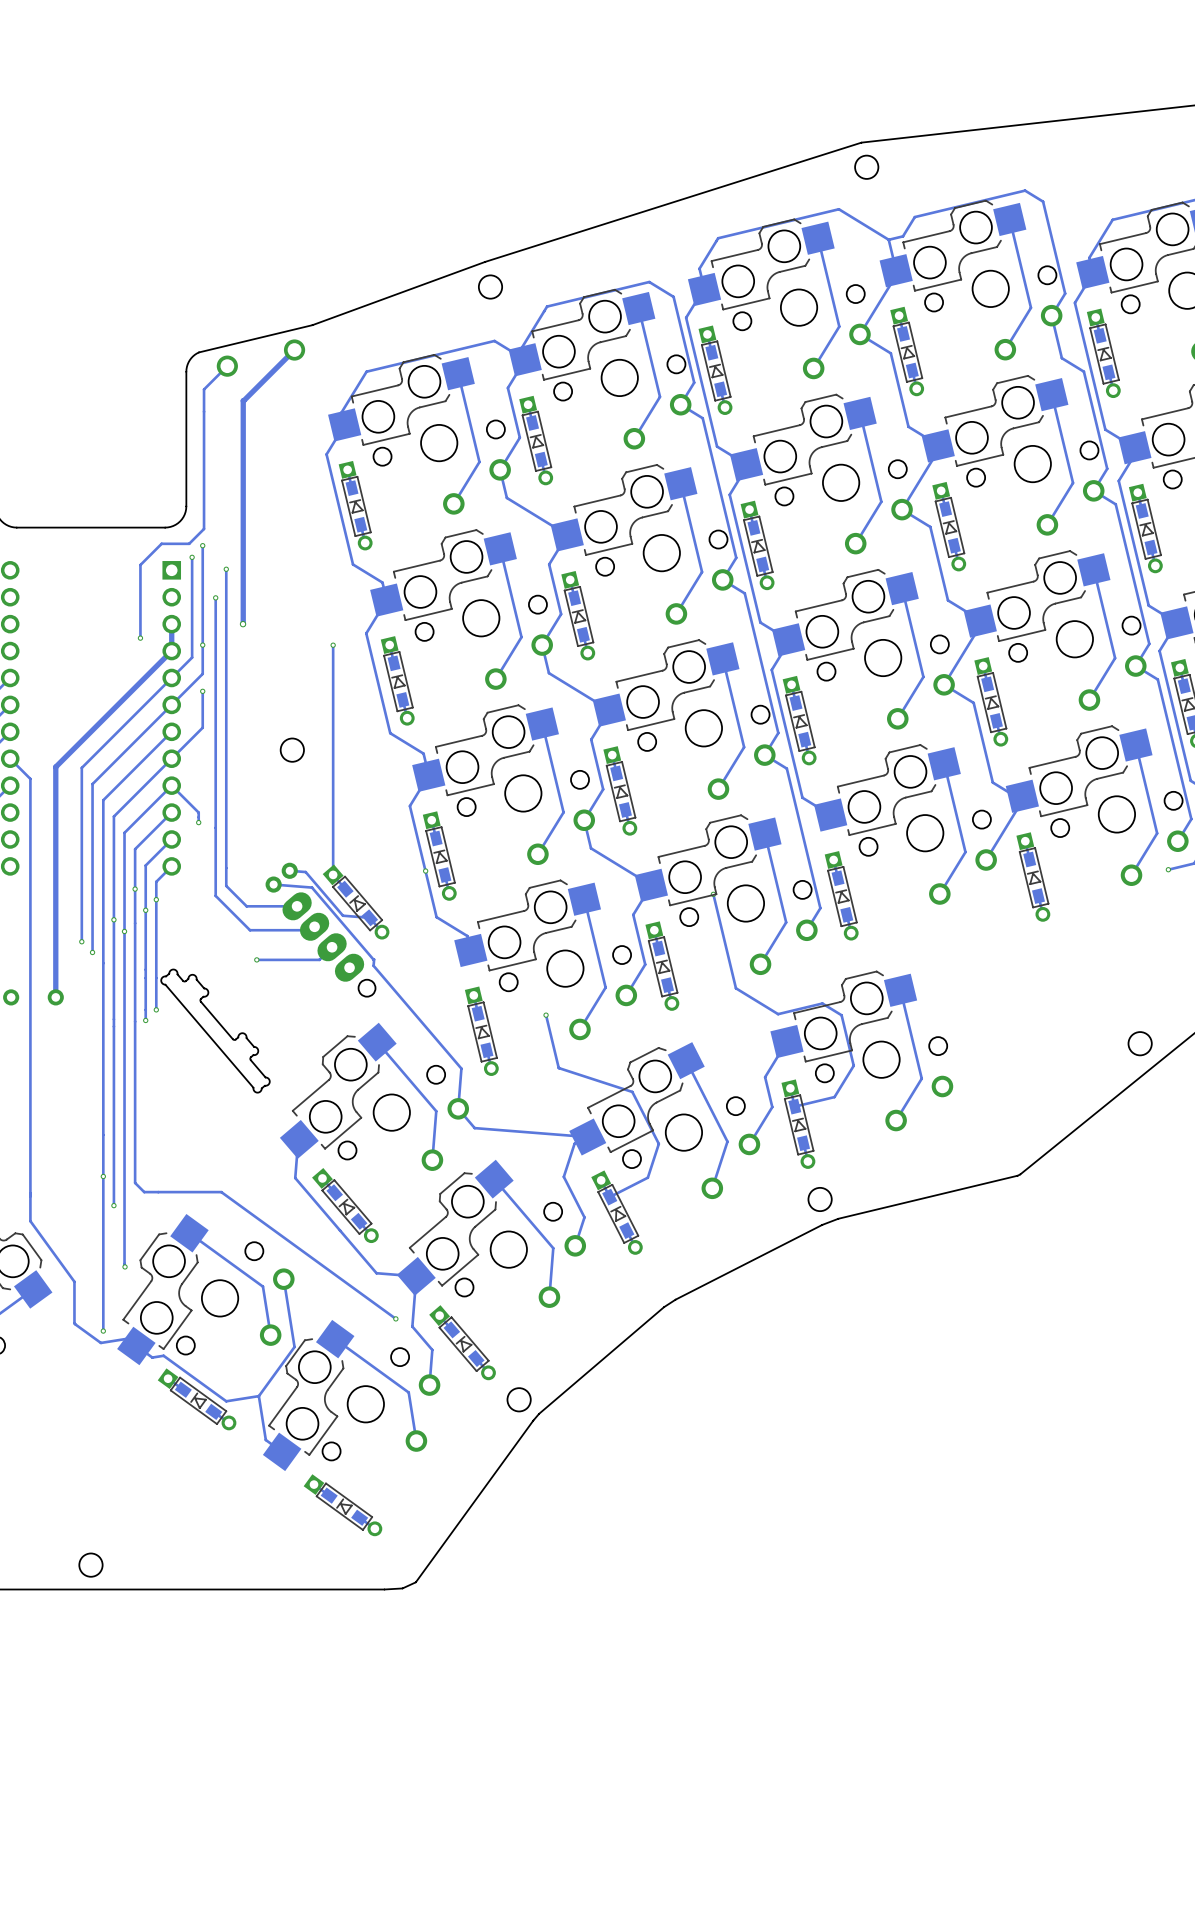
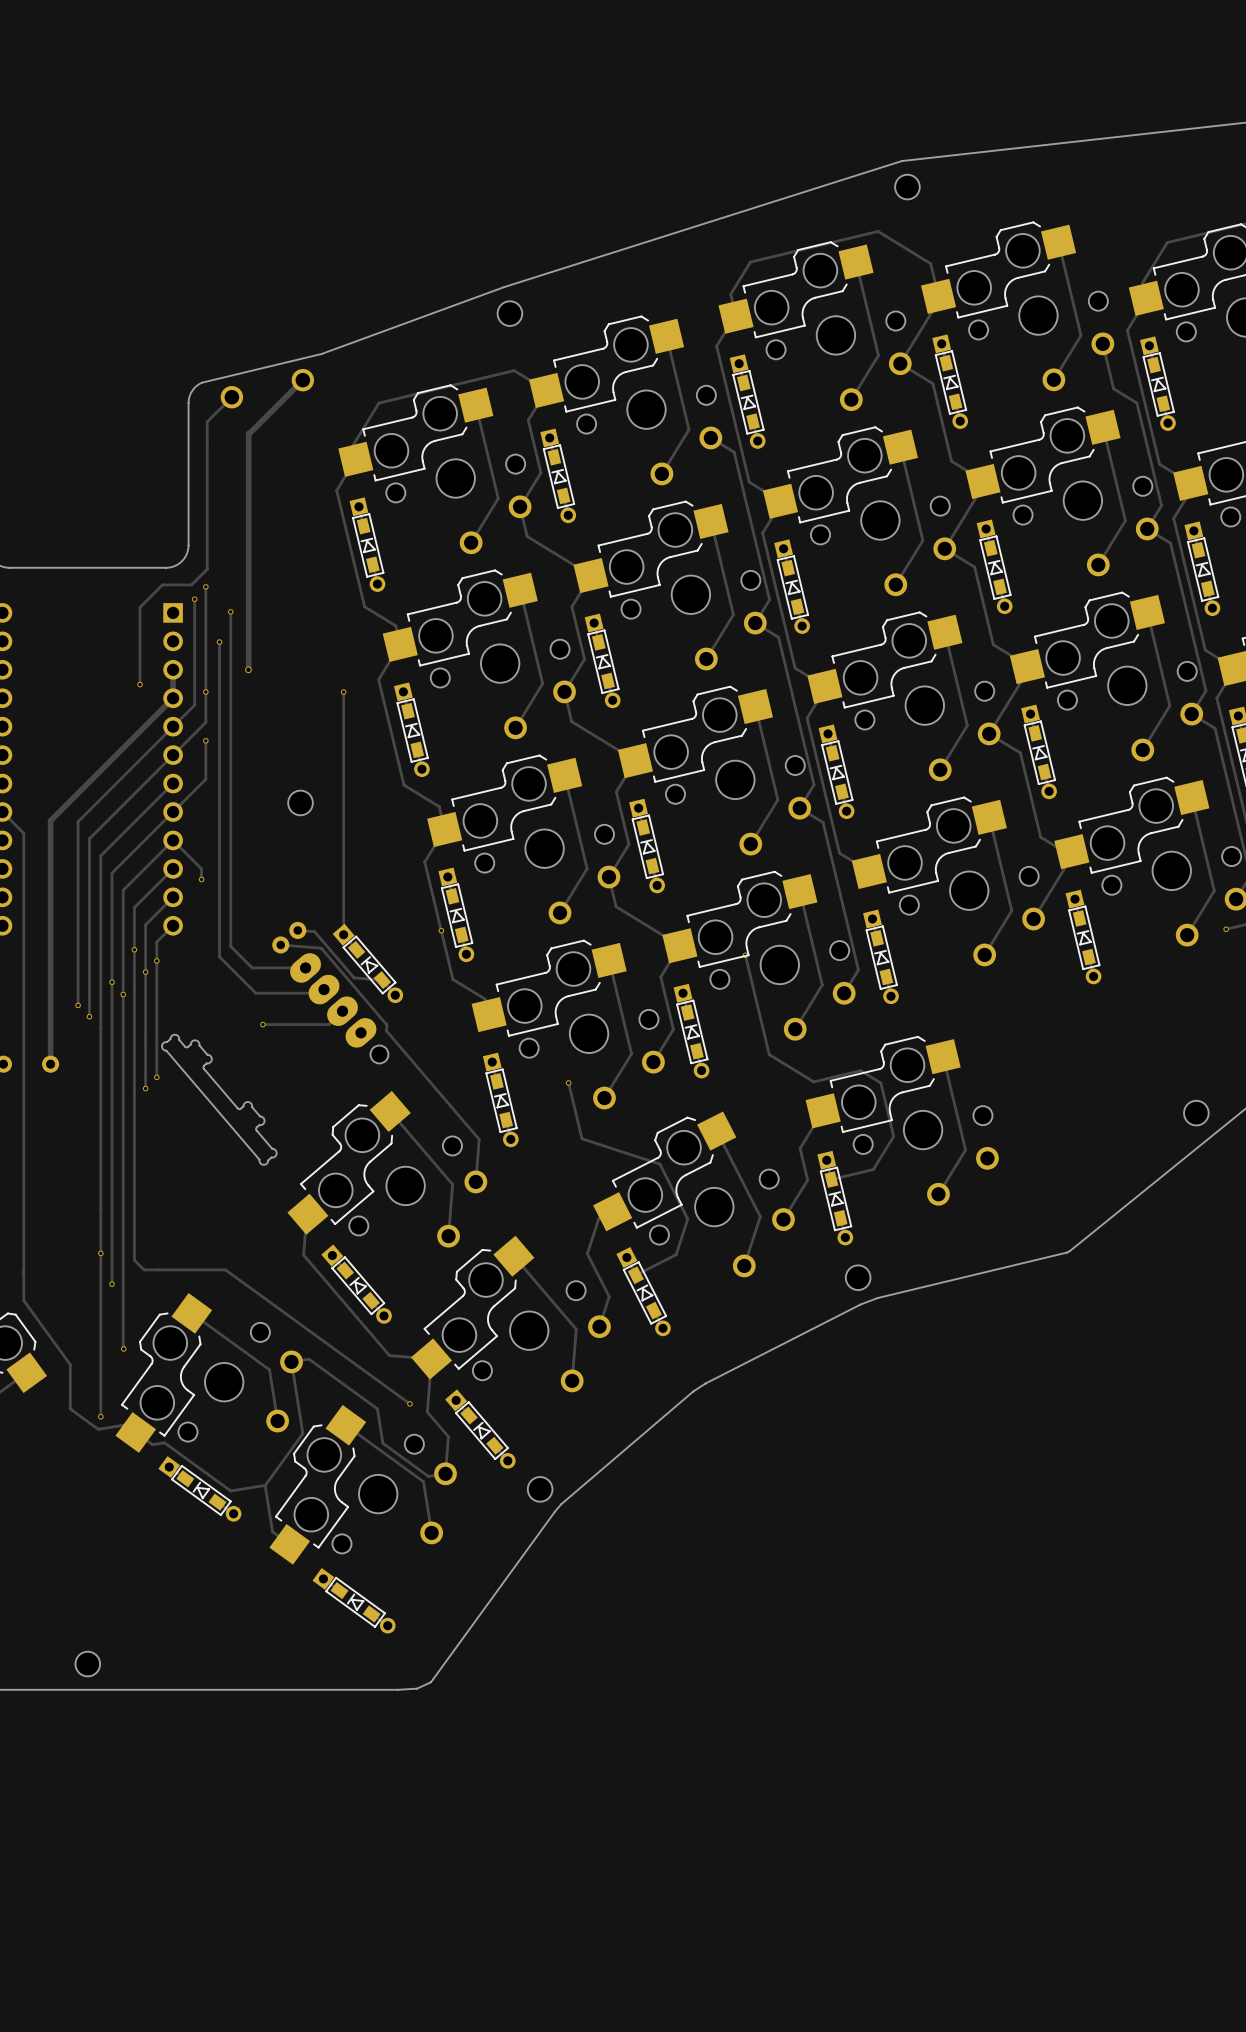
track: (888, 239) (903, 236) (914, 217) (1025, 190) (1043, 201) (1065, 293) (1051, 315) -> none
track: (525, 359) (522, 347) (547, 306) (649, 282) (673, 296) (694, 382) (680, 404) -> none
track: (458, 1108) (474, 1128) (587, 1137) -> none
track: none -> (291, 1361) (308, 1359) (377, 1408) (382, 1443) (428, 1476) (445, 1473)

